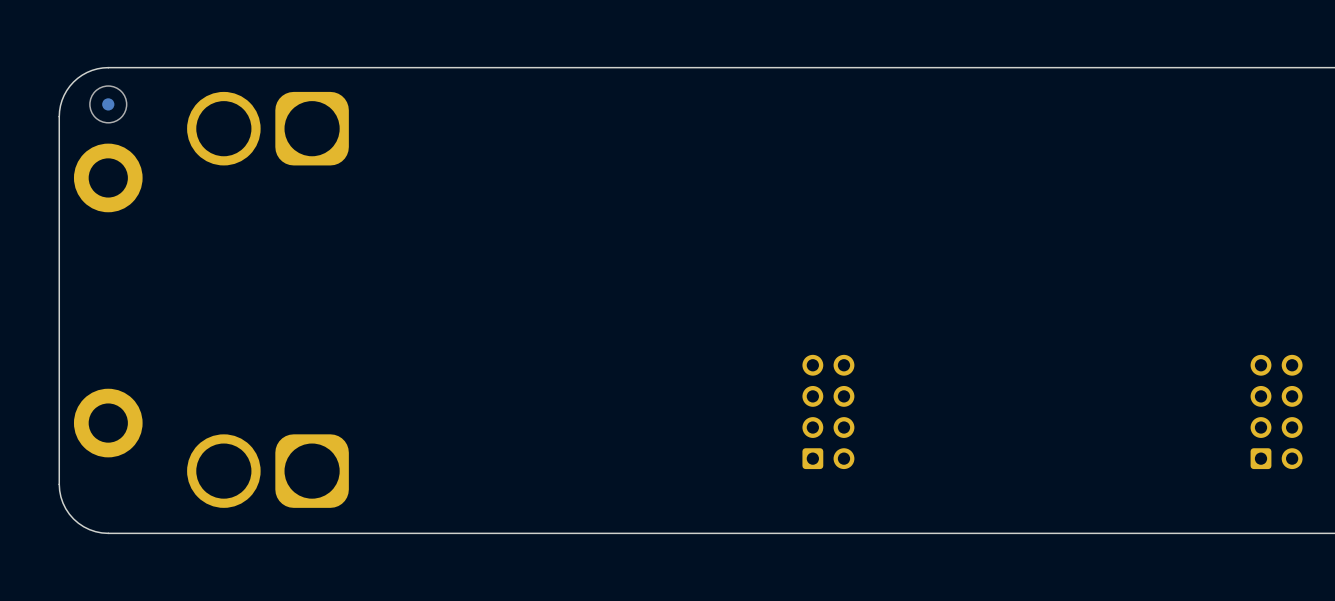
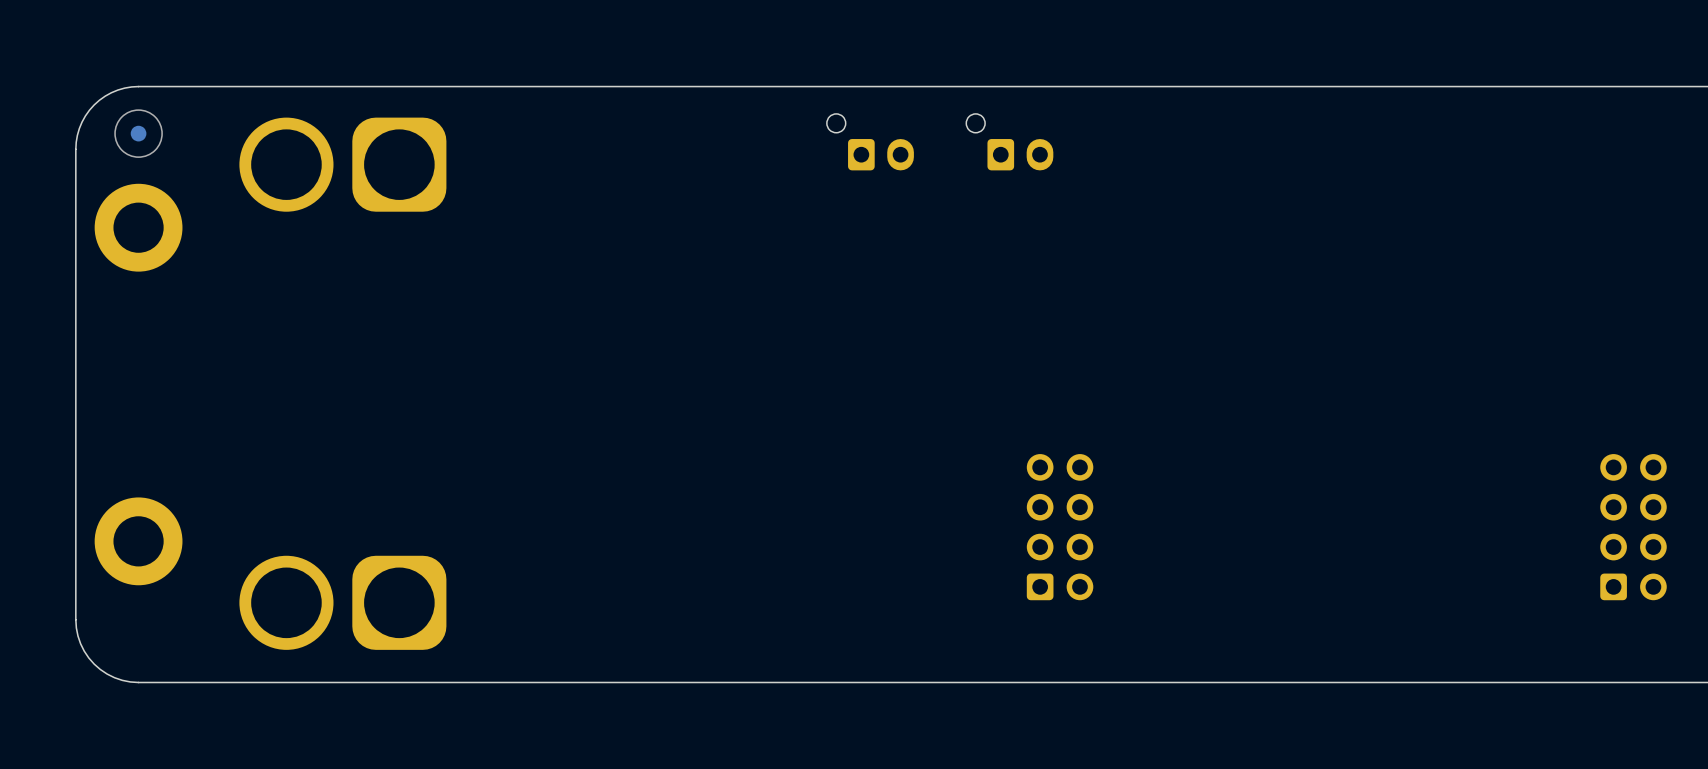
part: none -> (870, 142)
part: none -> (1009, 142)

